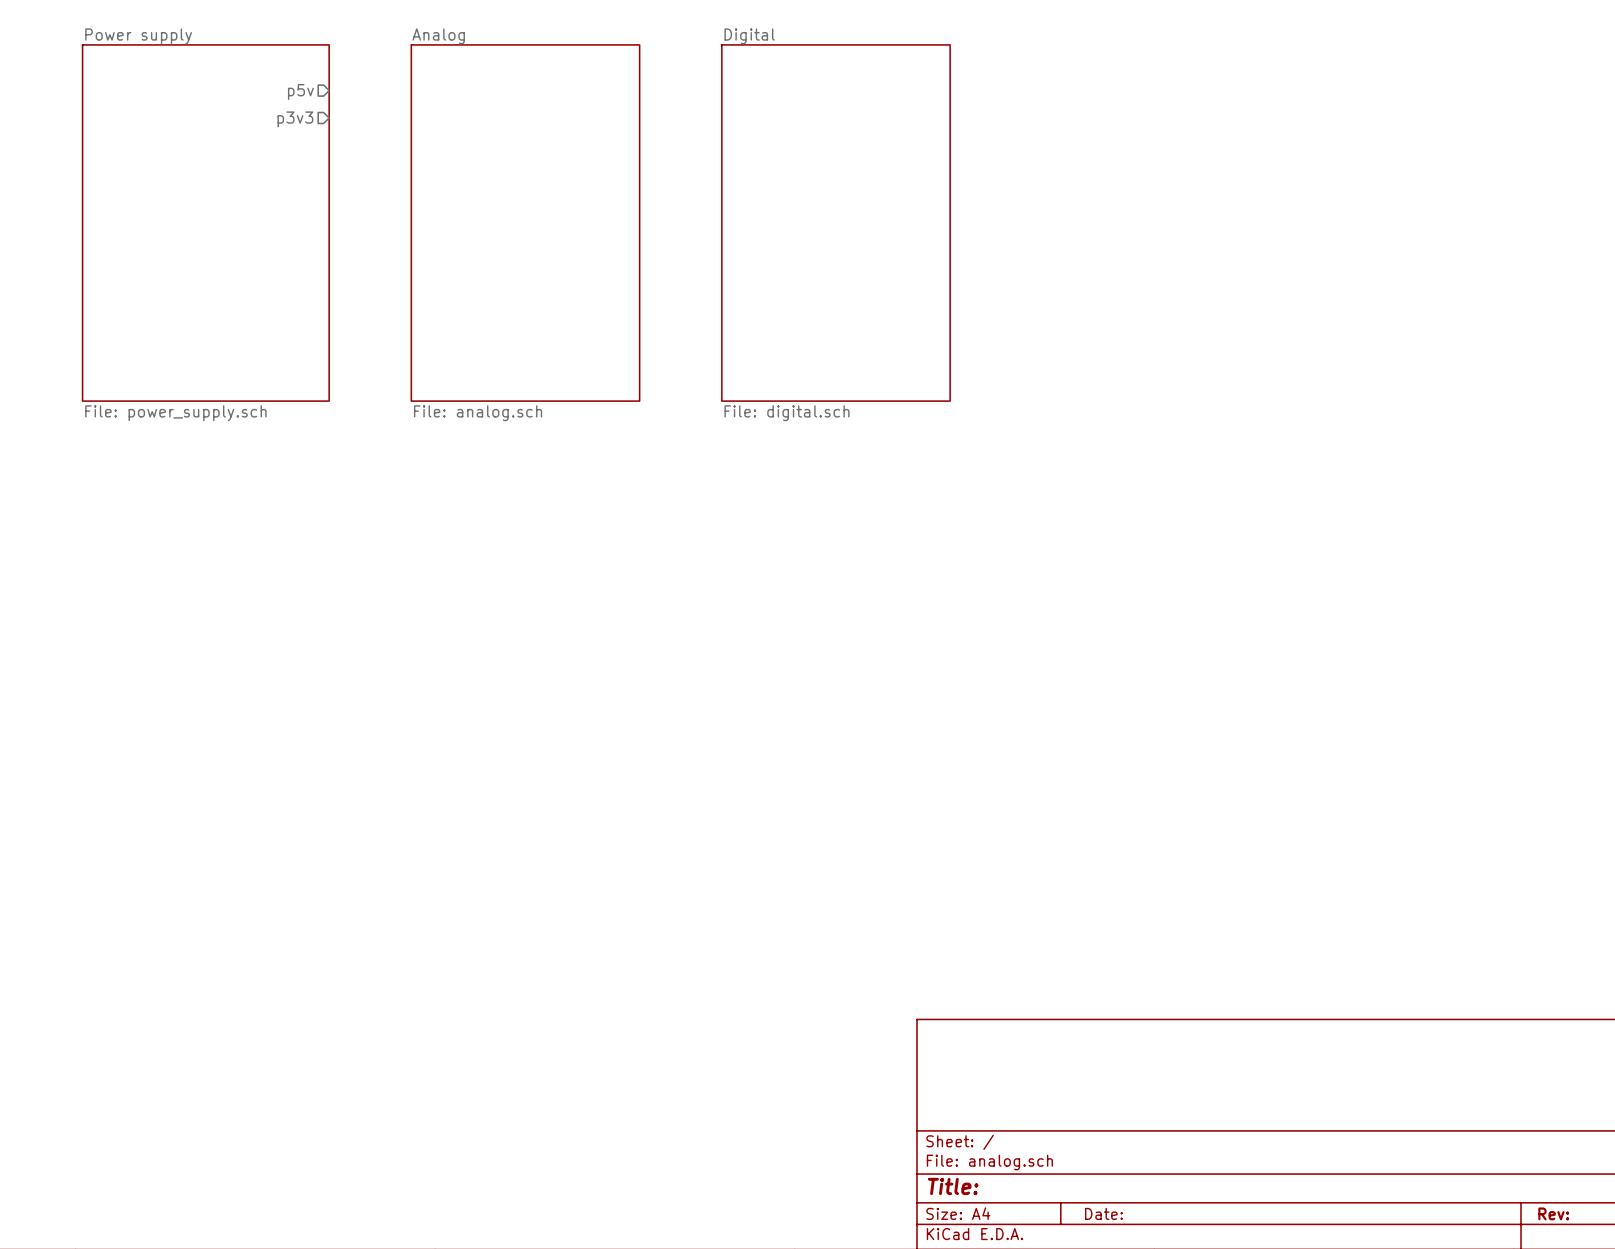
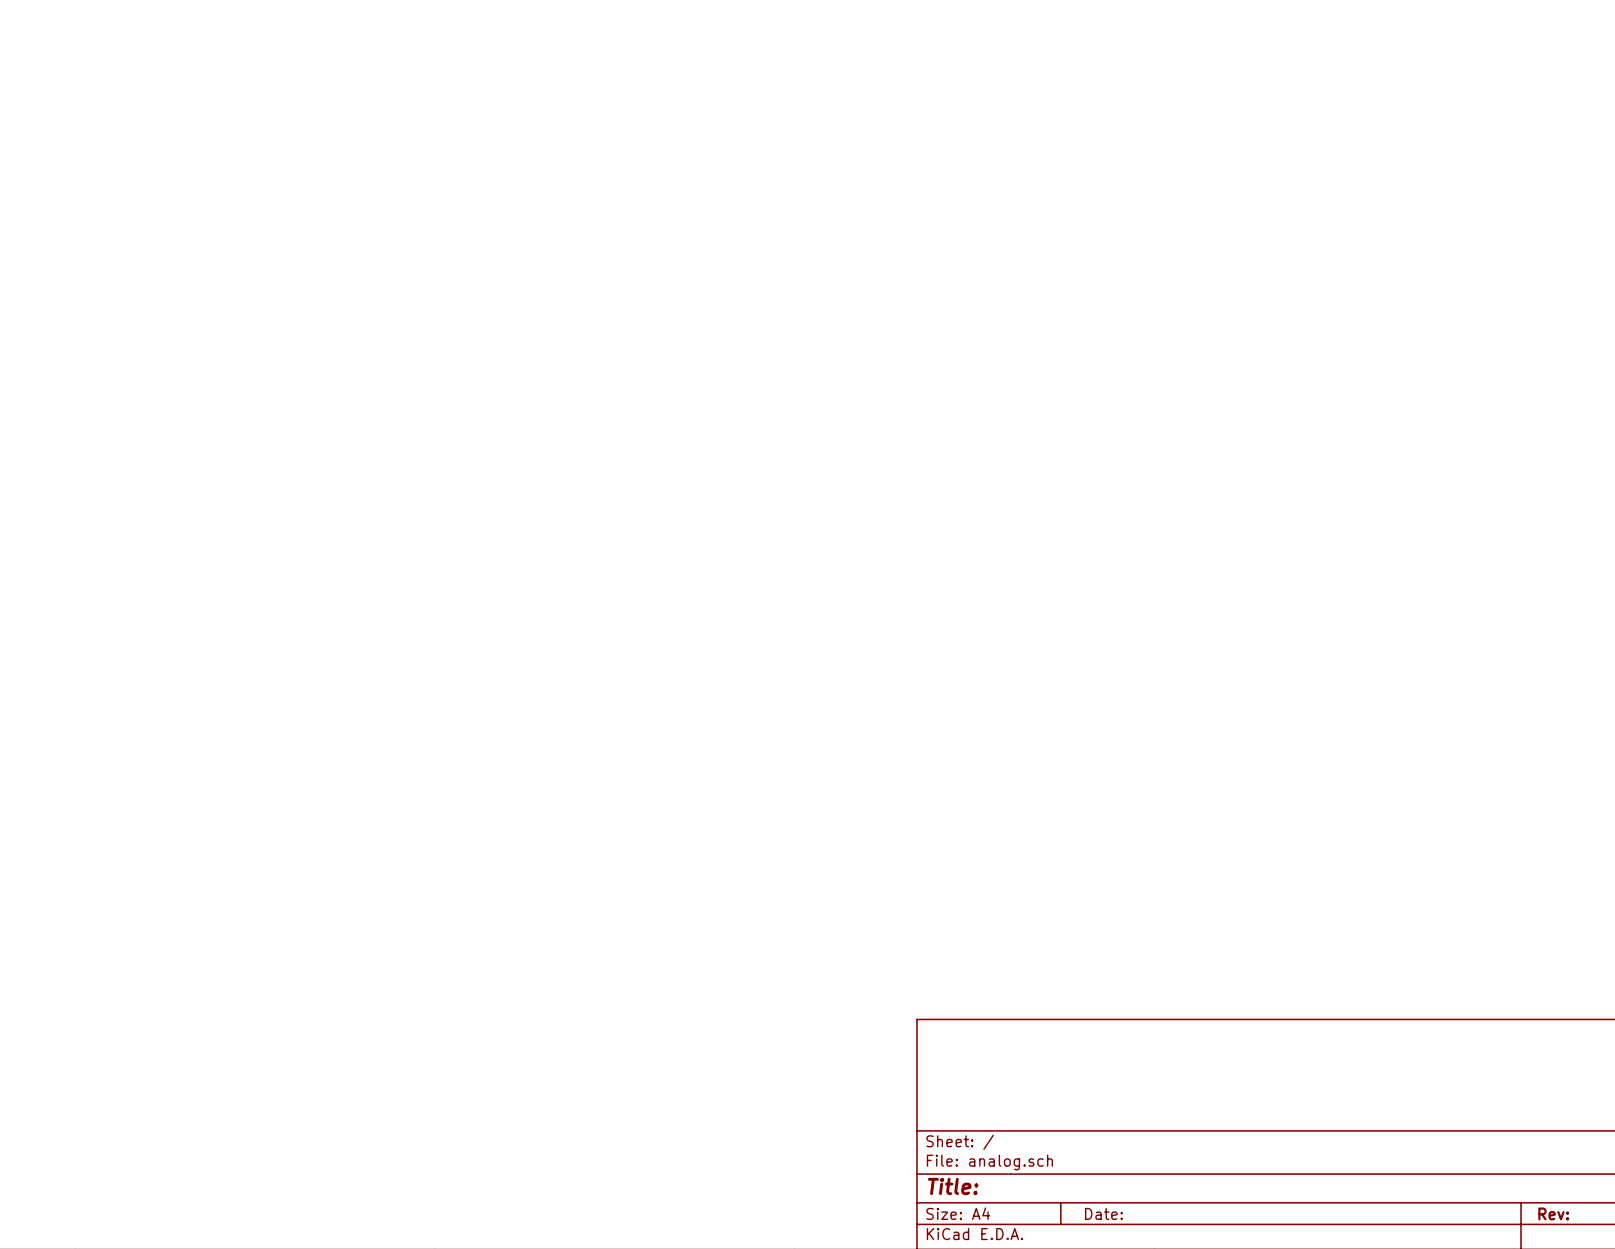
sheet pin: p5v (300, 92) -> none
sheet pin: p3v3 (295, 119) -> none
sheet Power supply: File: power_supply.sch (205, 223) -> none
sheet Analog: File: analog.sch (525, 223) -> none
sheet Digital: File: digital.sch (835, 223) -> none

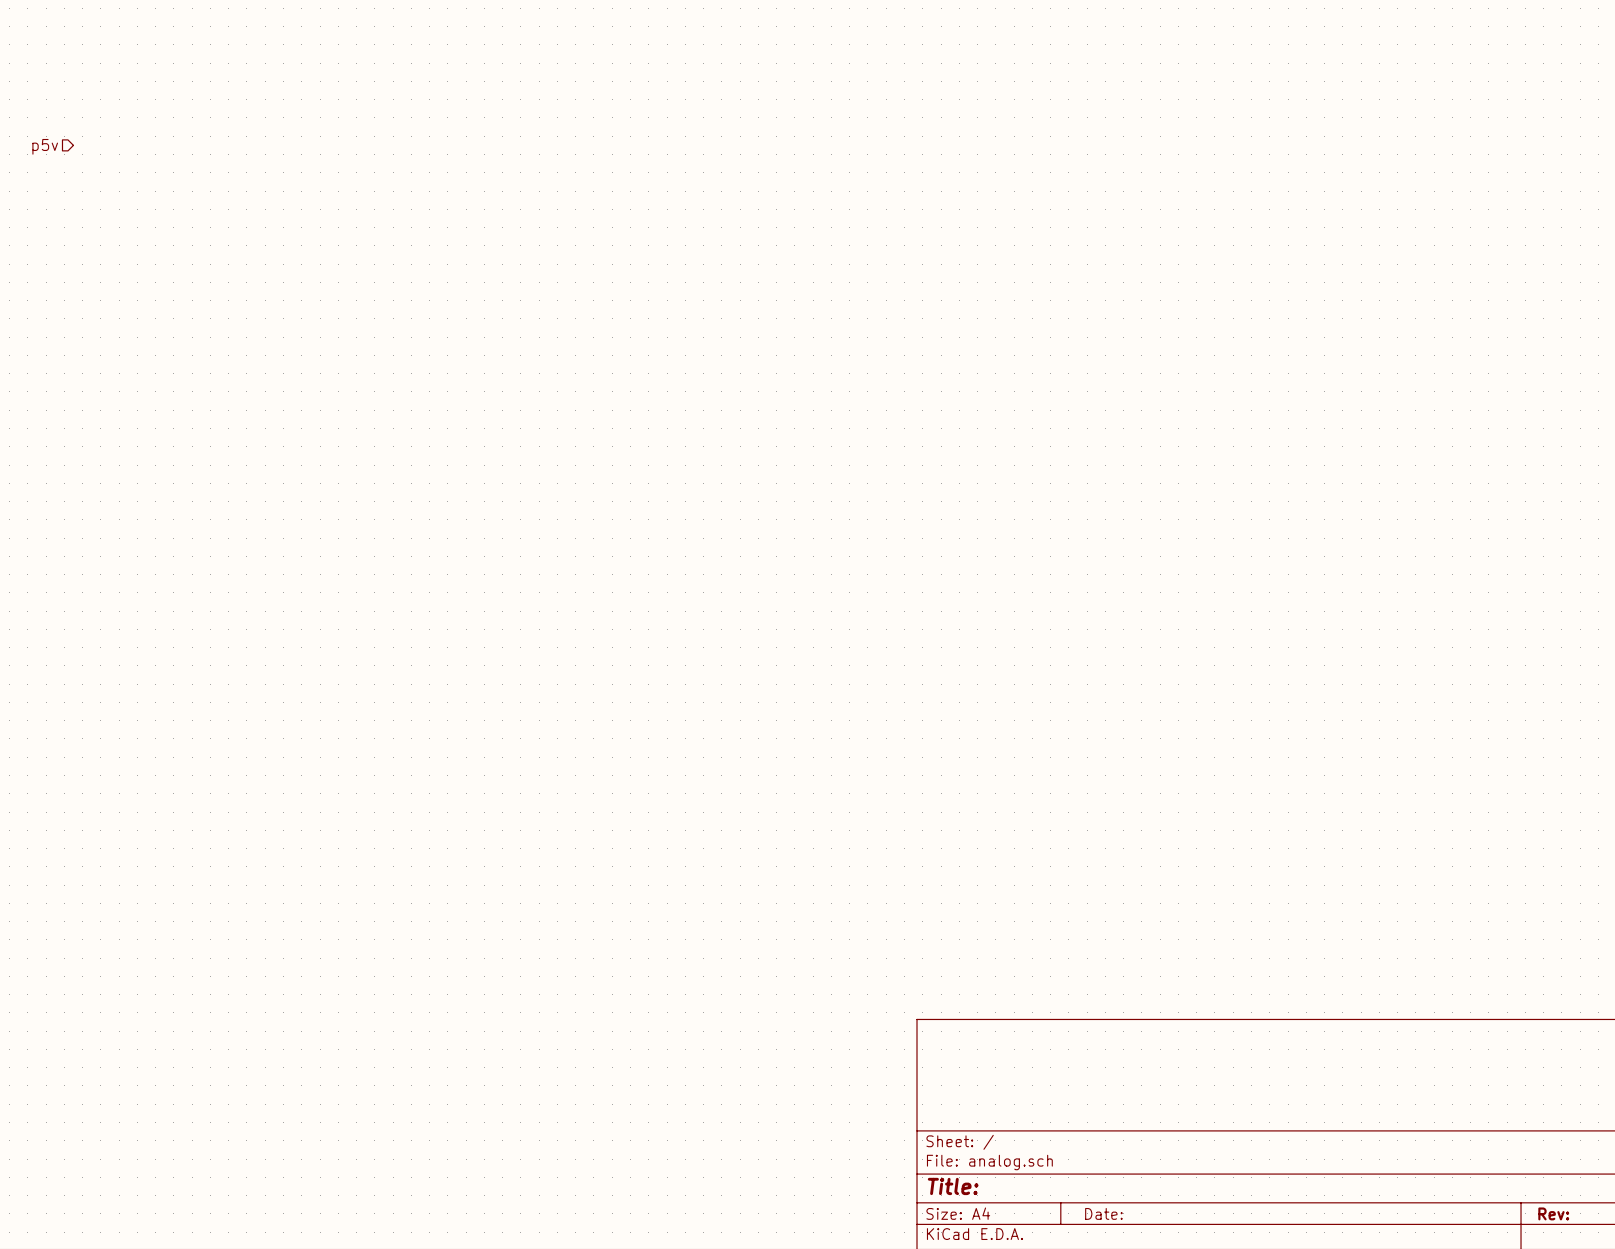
hierarchical label: none -> p5v (45, 146)

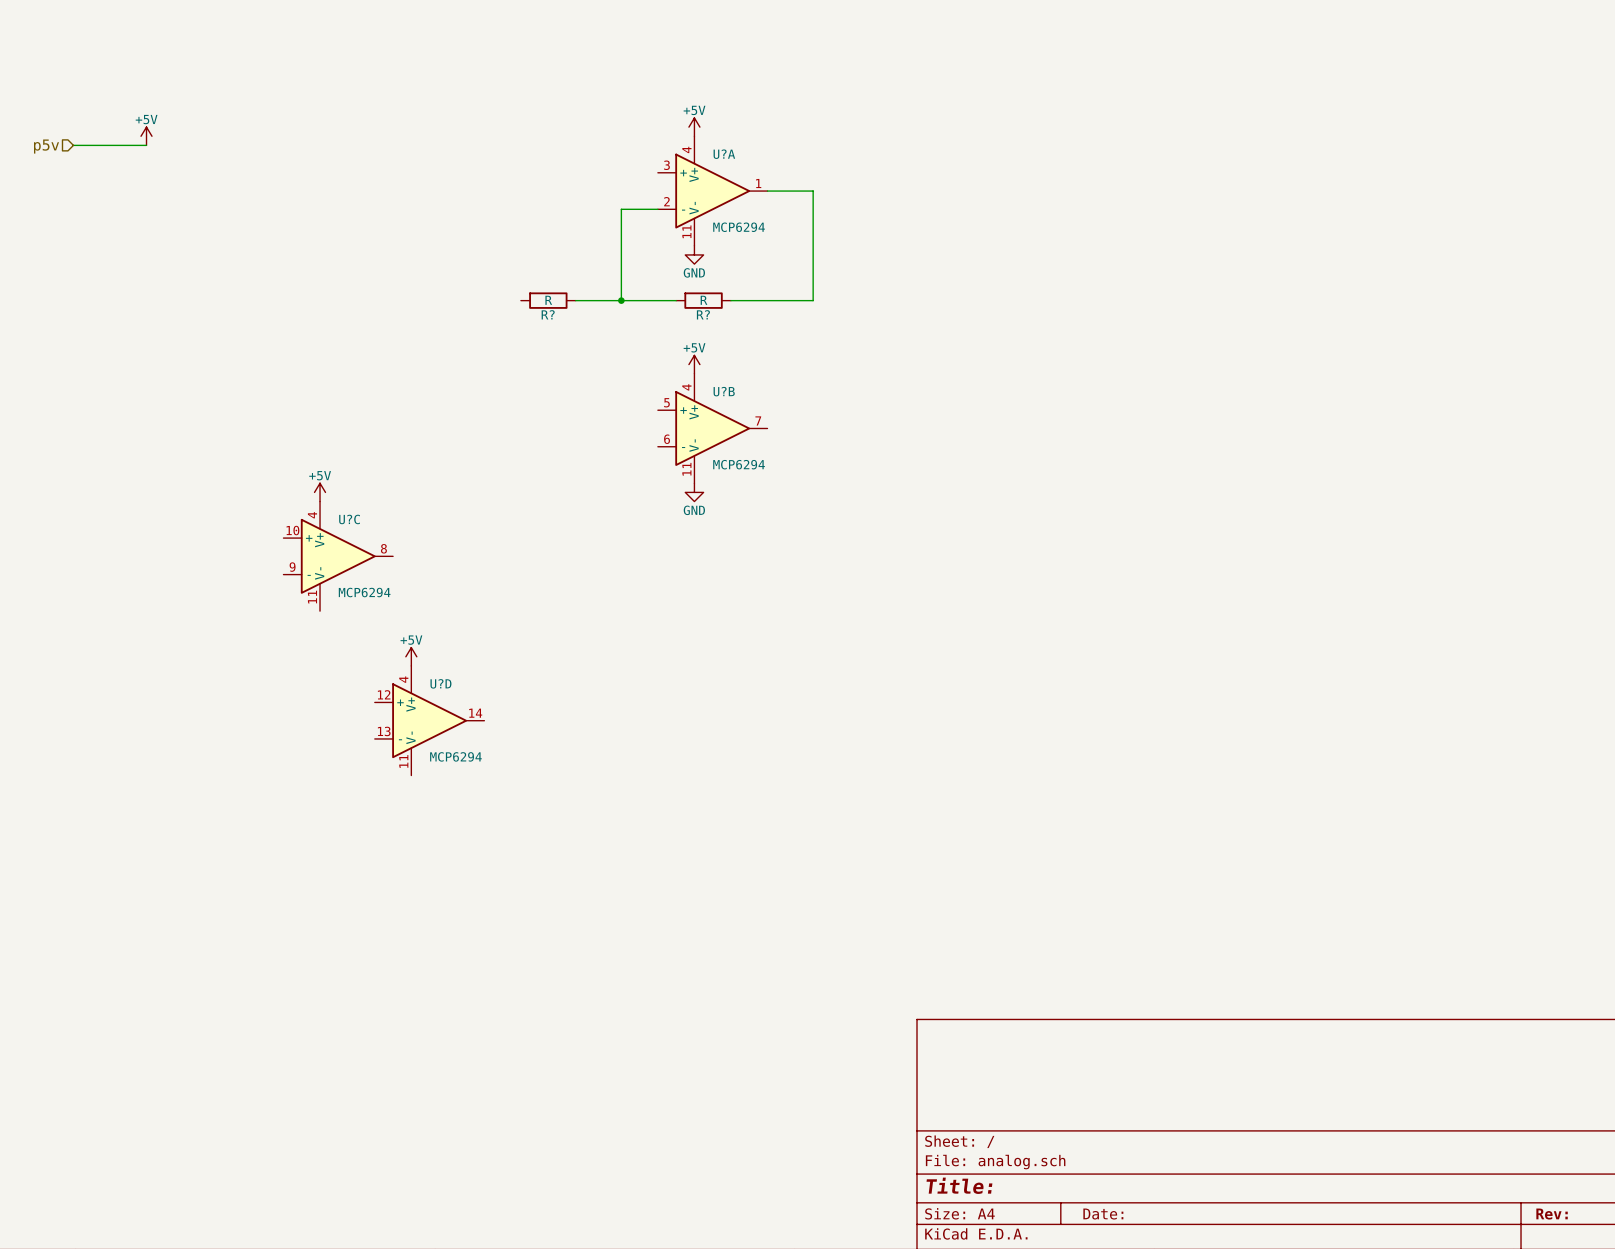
power symbol: none -> +5V (694, 127)
power symbol: none -> +5V (146, 136)
wire: none -> (73, 145) (146, 145)
U?A: none -> MCP6294 (712, 191)
wire: none -> (767, 191) (813, 191) (813, 300) (730, 300)
wire: none -> (657, 209) (621, 209) (621, 300)
power symbol: none -> GND (694, 254)
R?: none -> R (548, 300)
wire: none -> (575, 300) (676, 300)
junction: none -> (621, 300)
R?: none -> R (703, 300)
power symbol: none -> +5V (694, 364)
U?B: none -> MCP6294 (712, 428)
power symbol: none -> +5V (320, 492)
power symbol: none -> GND (694, 492)
U?C: none -> MCP6294 (338, 556)
power symbol: none -> +5V (411, 656)
U?D: none -> MCP6294 (429, 720)

